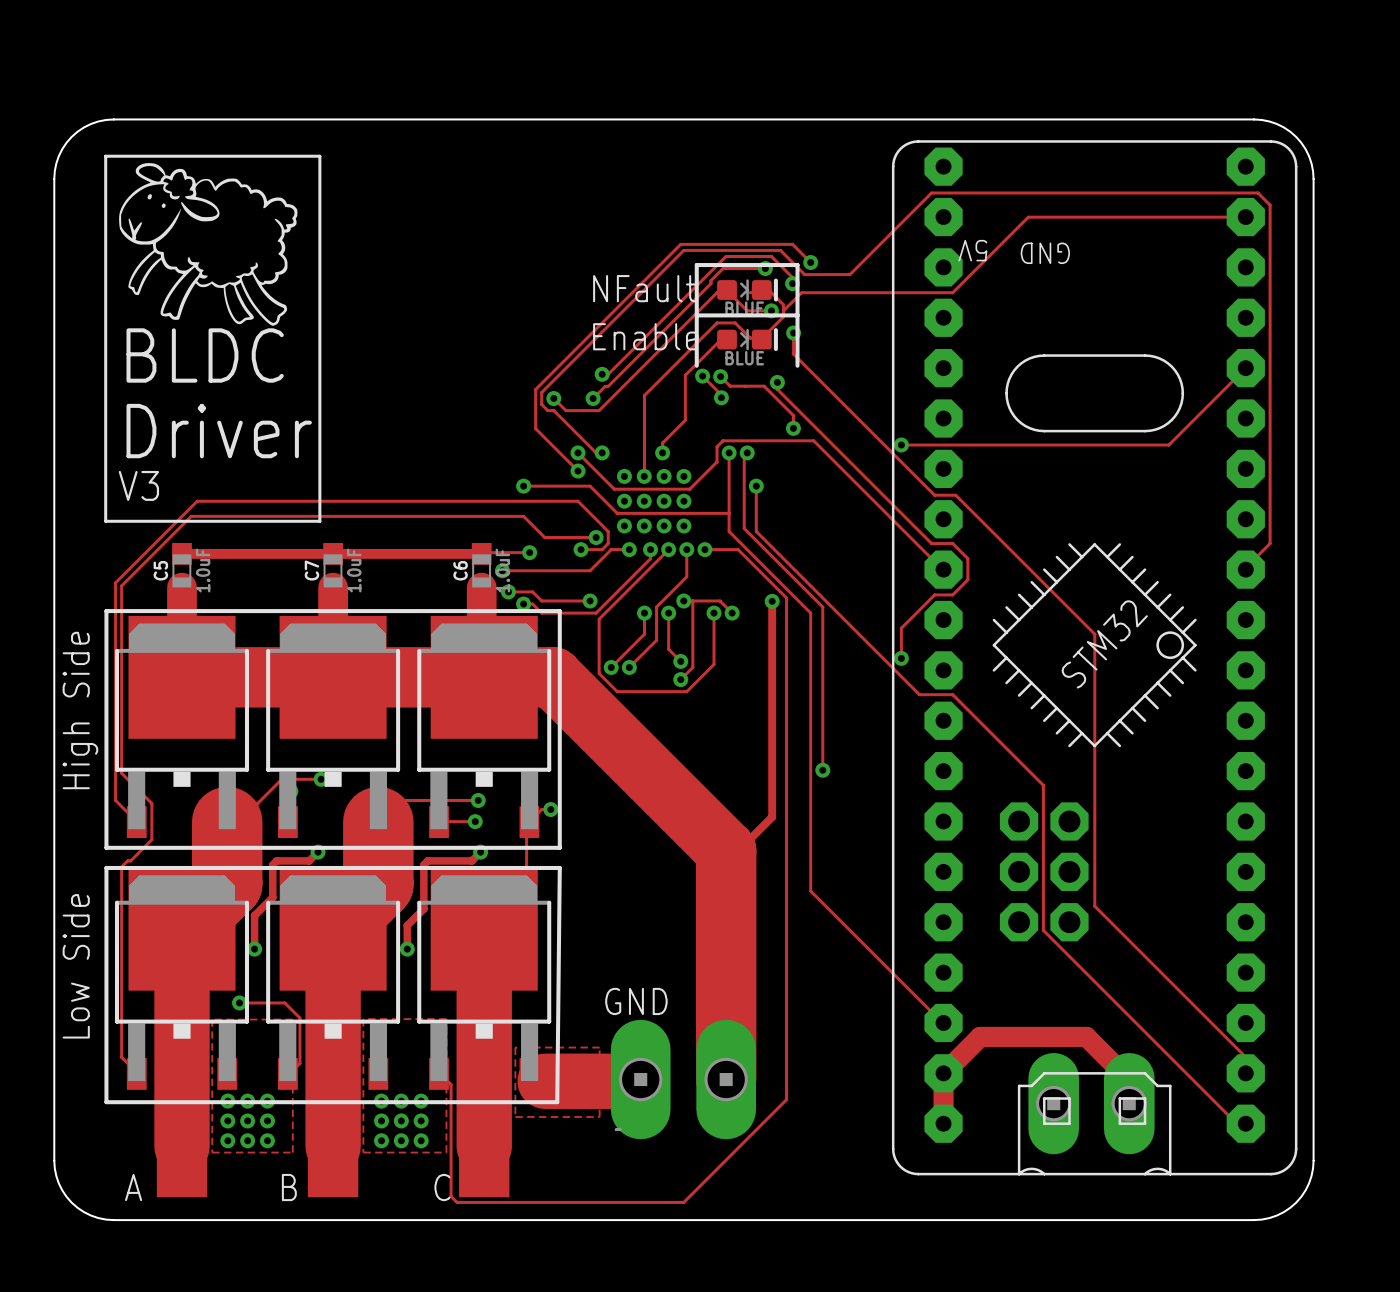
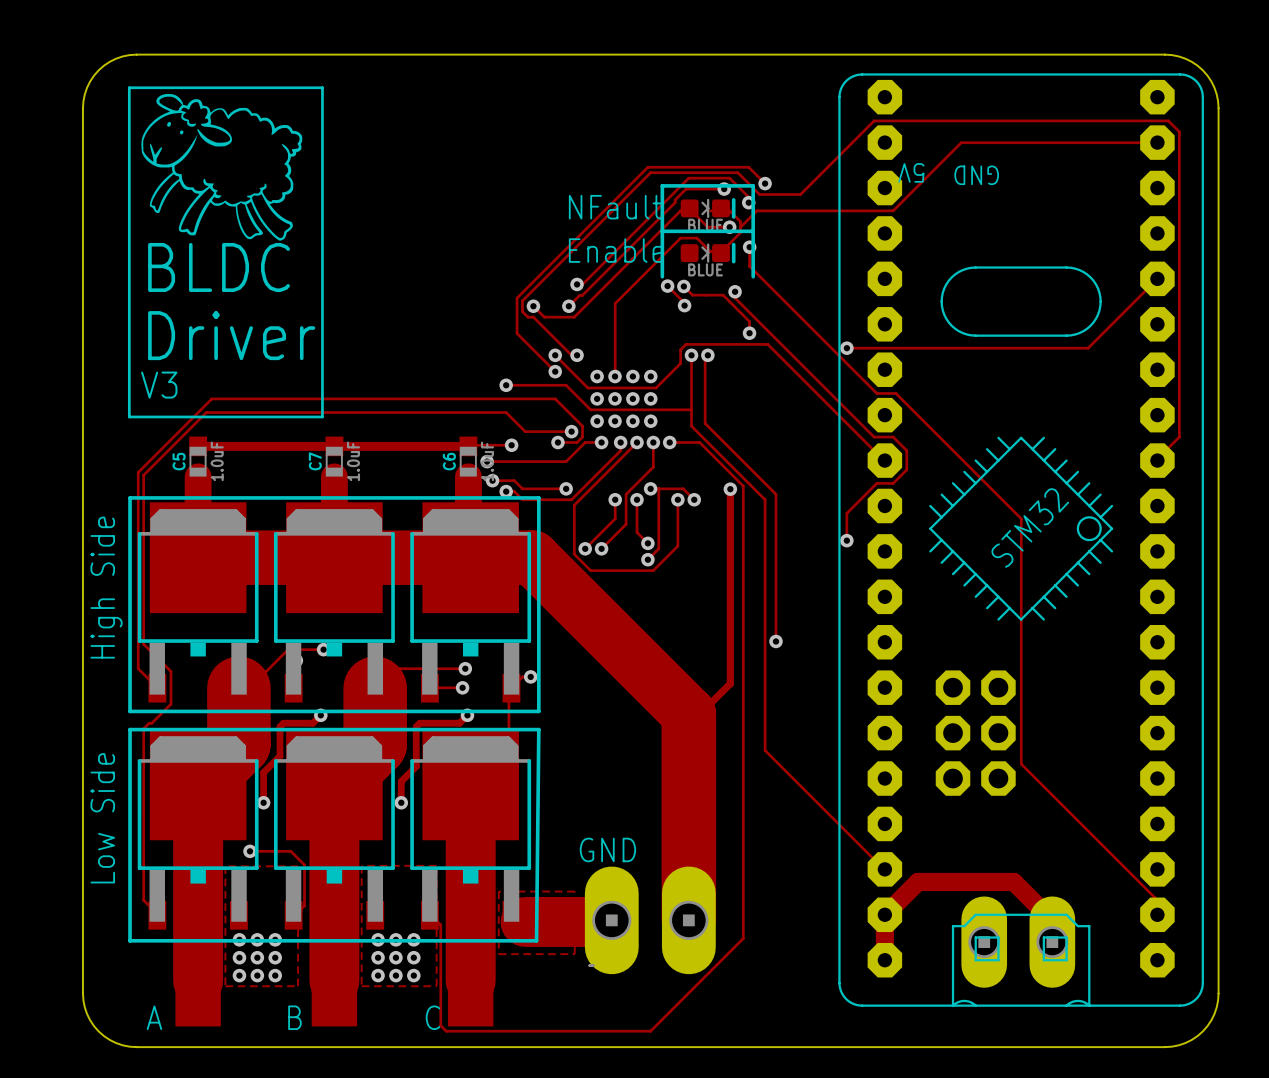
track: (727, 339) (721, 339) (685, 375) (685, 420) (662, 442) (662, 452) -> none
via: (662, 452) -> none
track: (756, 486) (756, 531) (919, 694) (952, 694) (1043, 785) (1043, 930) (1233, 1120) (1242, 1120) (1245, 1123) -> none
via: (756, 486) -> none

